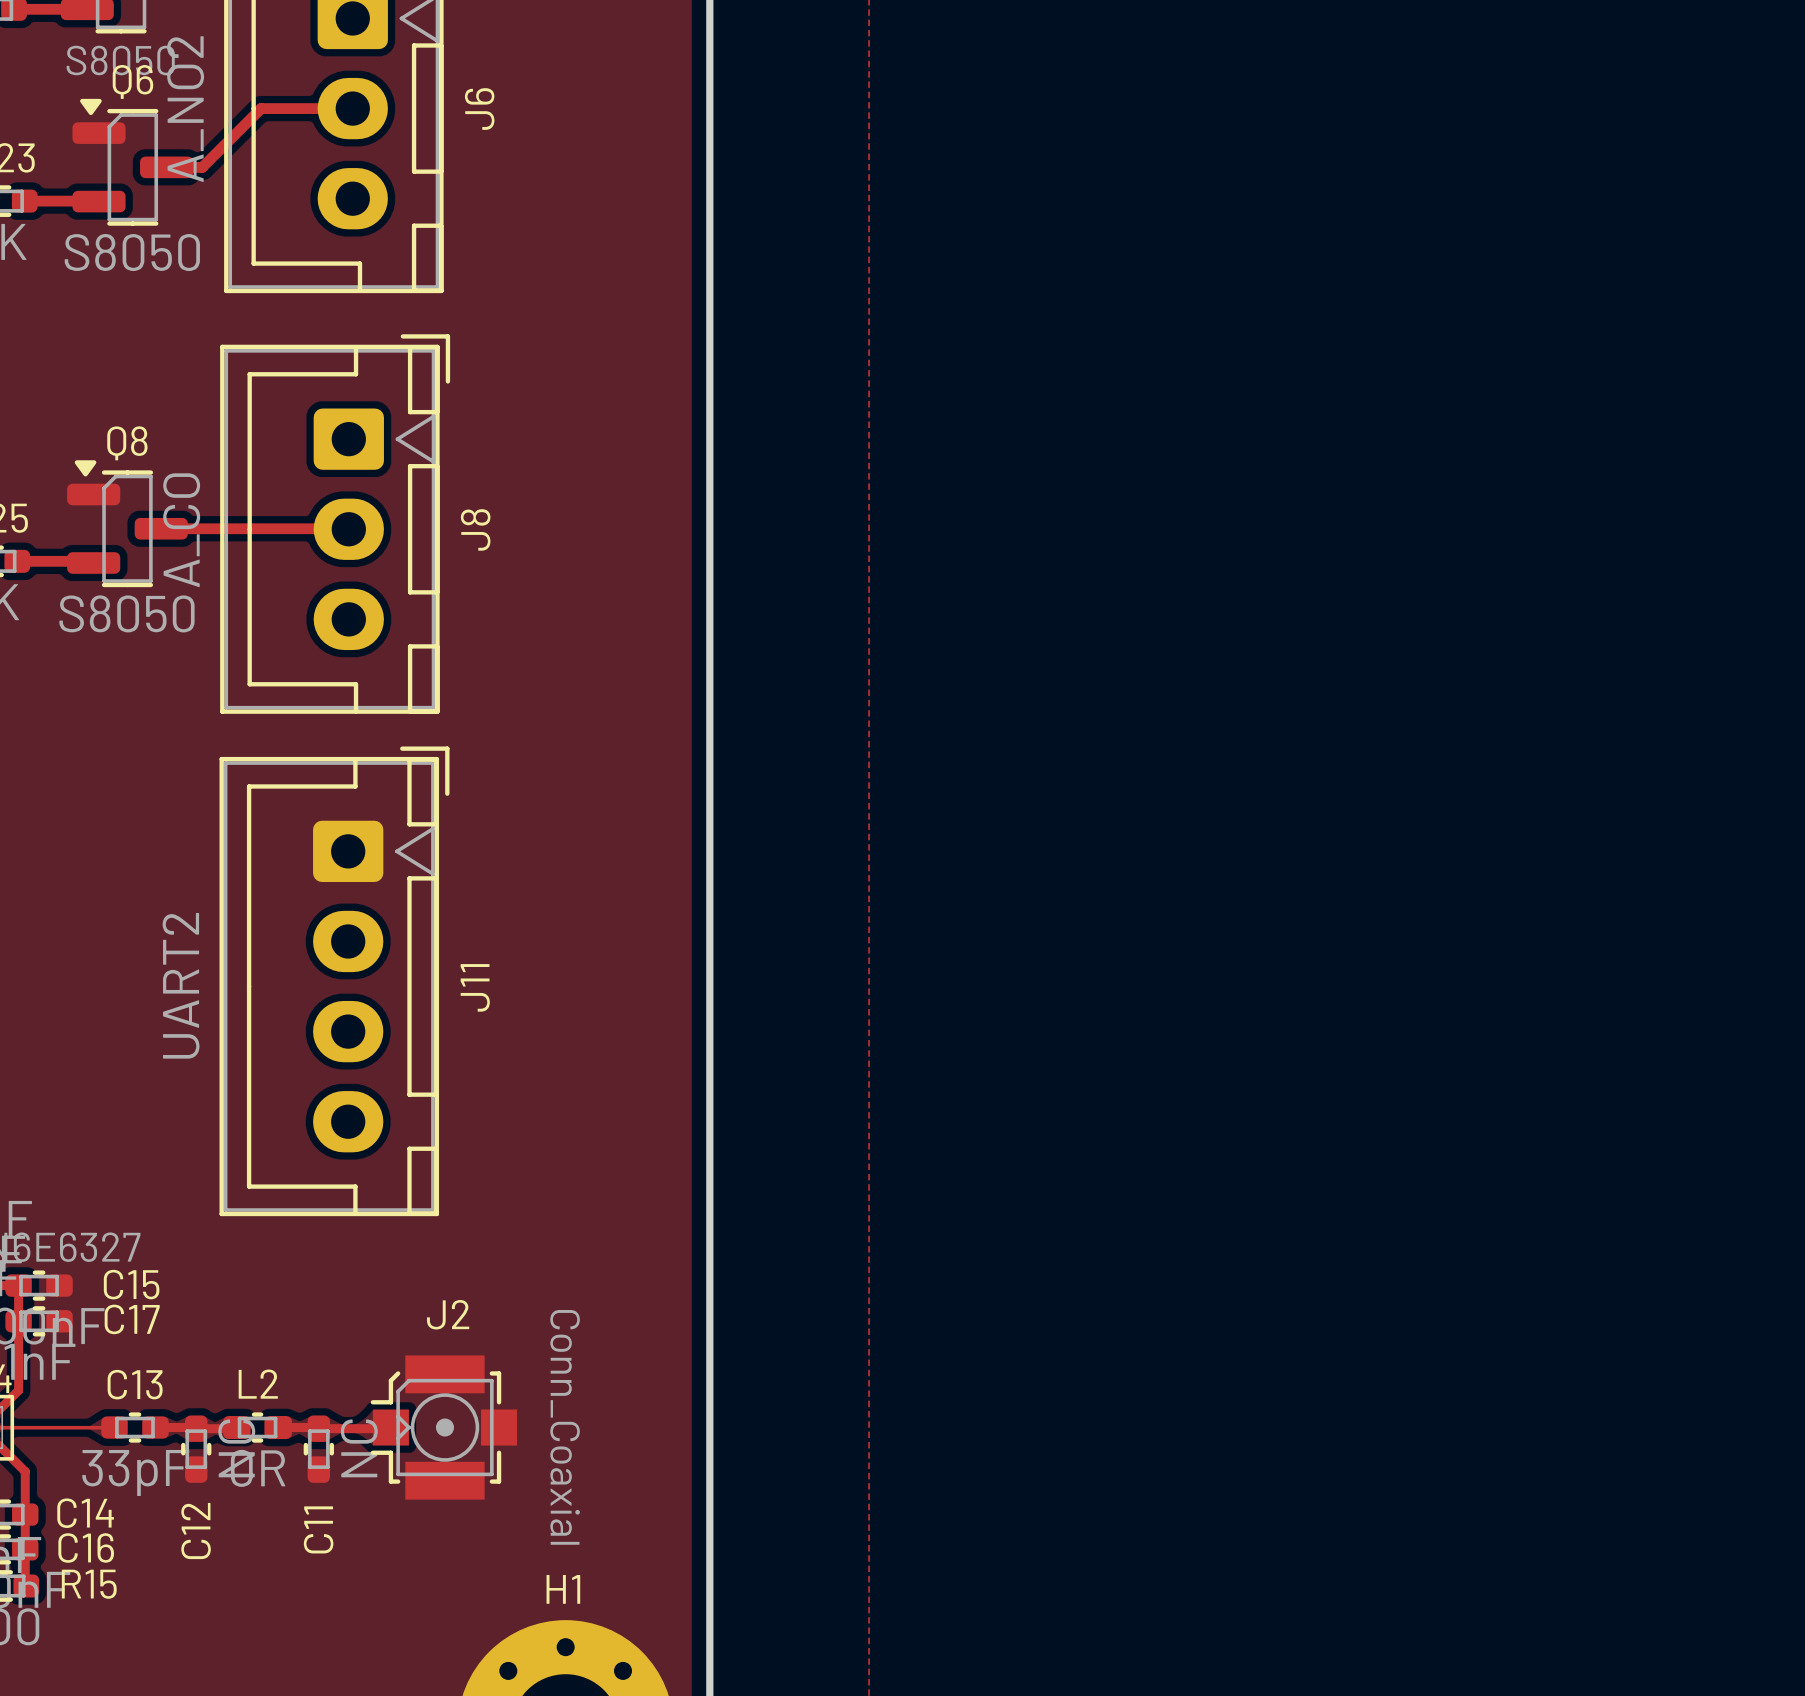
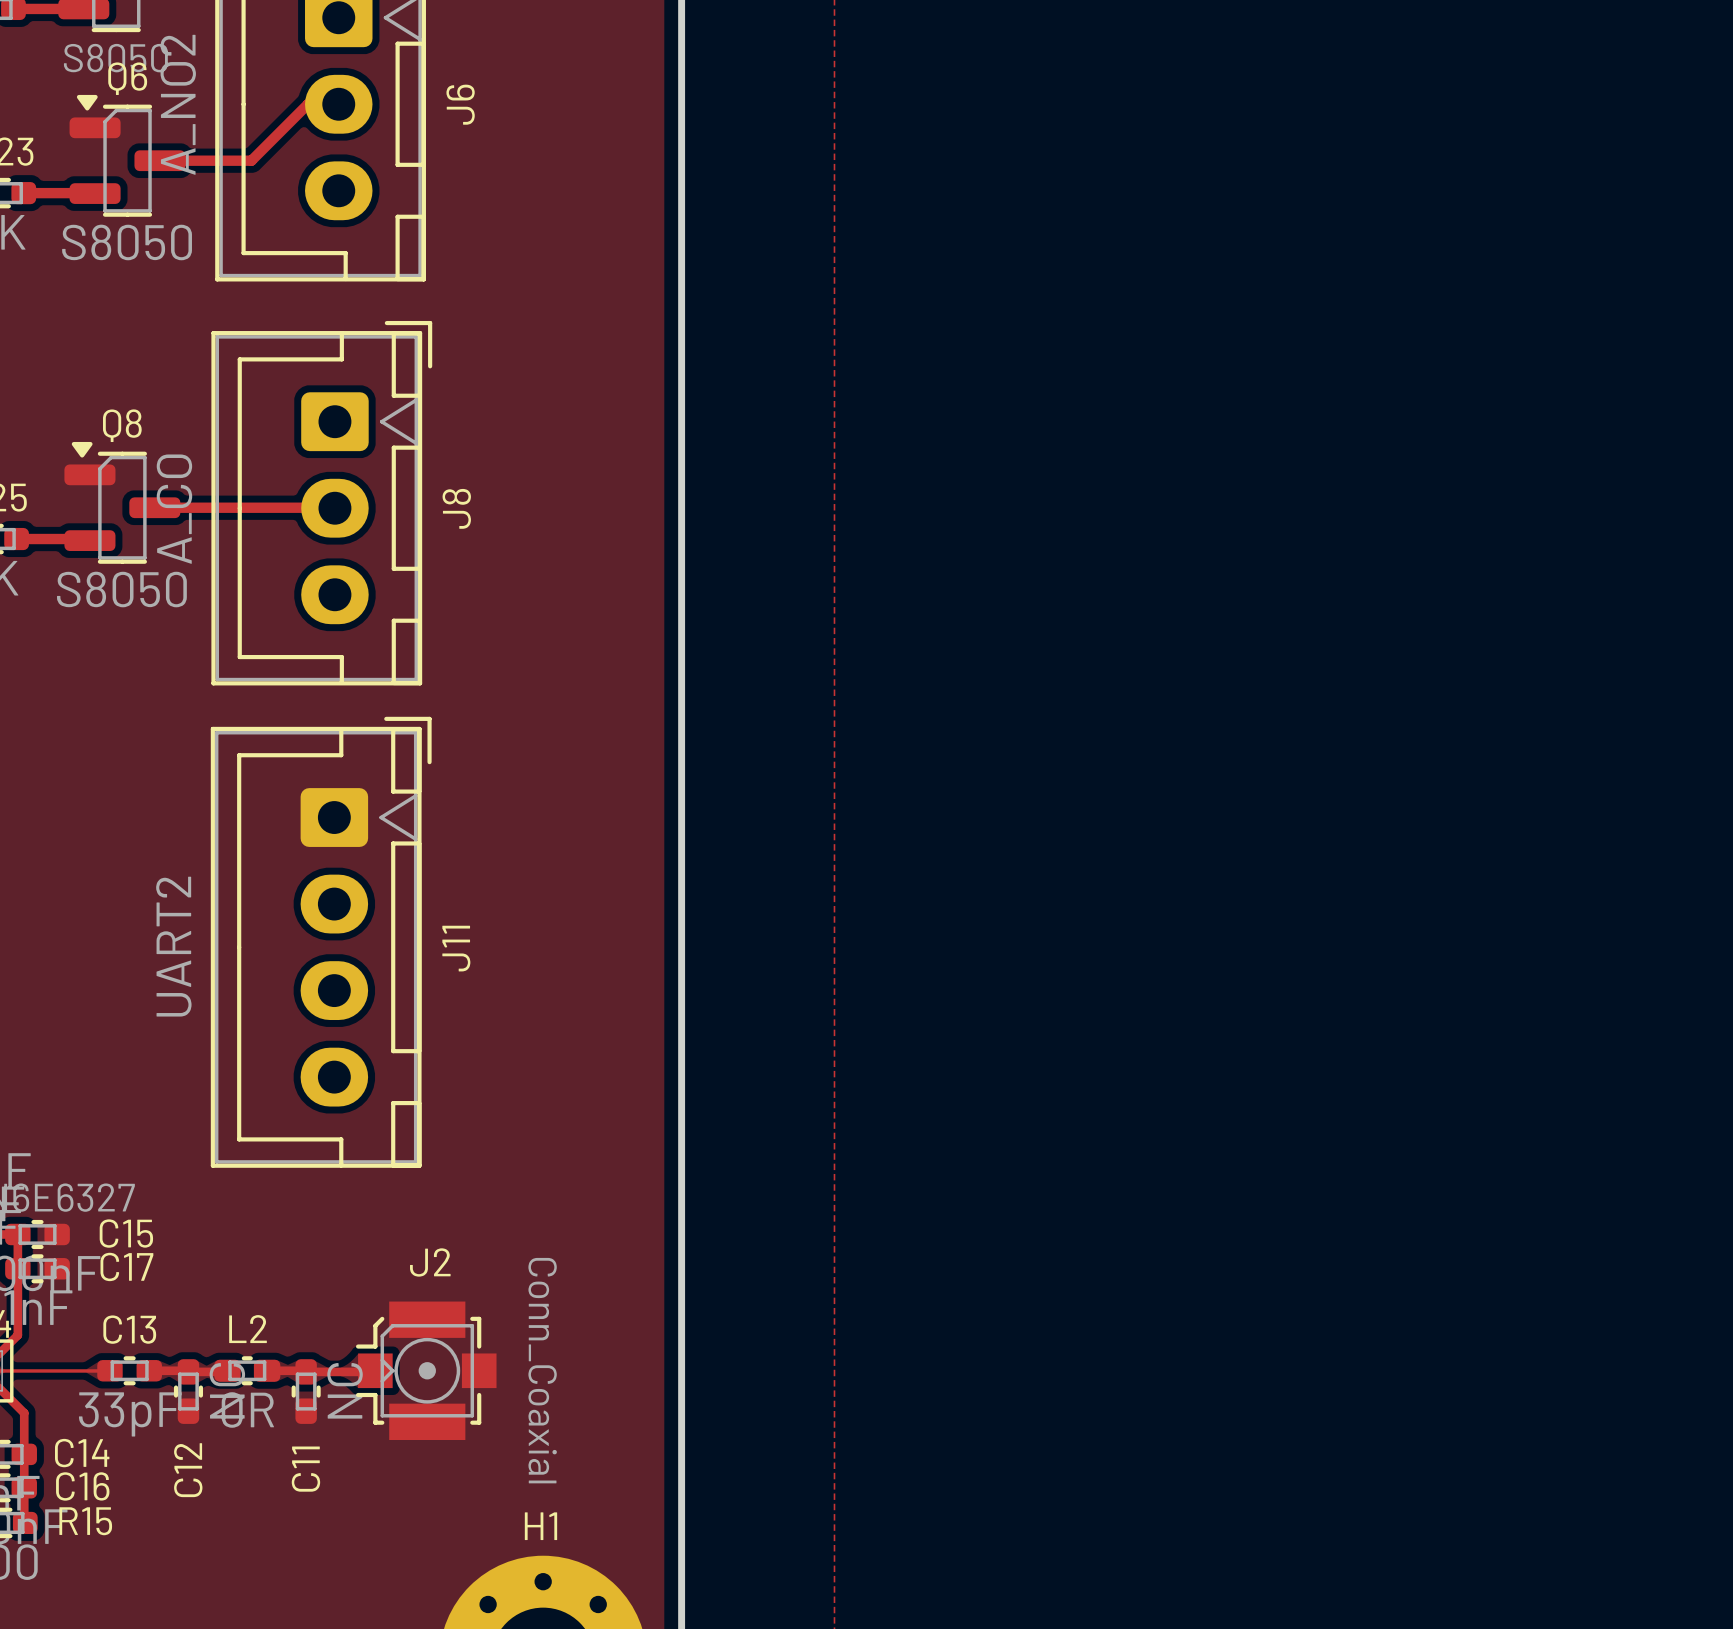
track: (320, 108) (261, 108) (202, 167) -> (307, 104) (251, 160) (194, 160)

